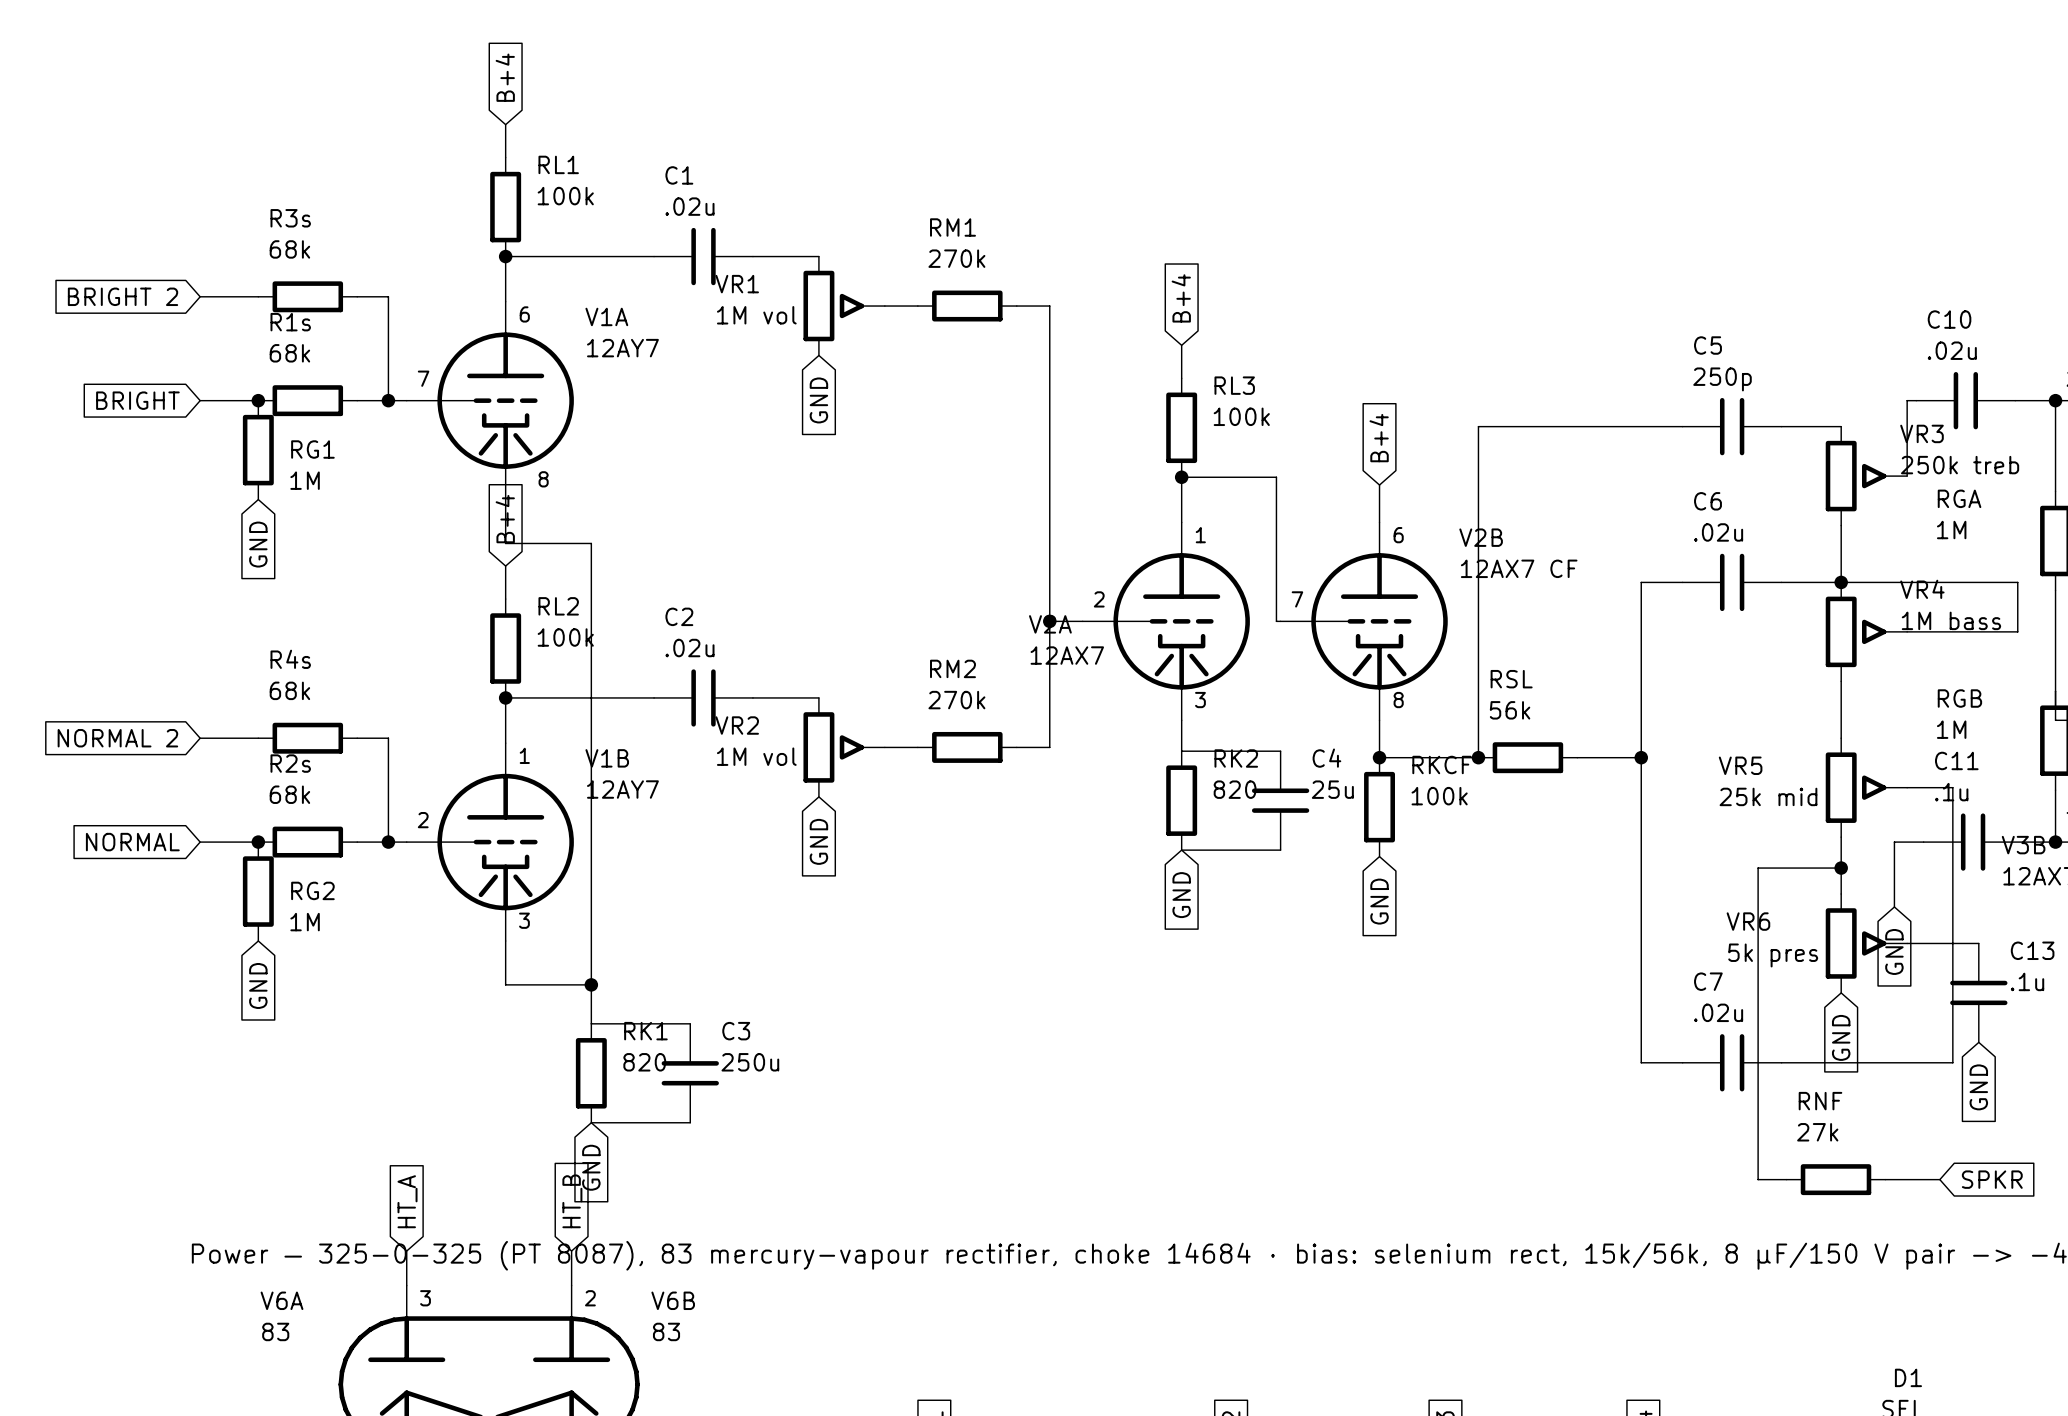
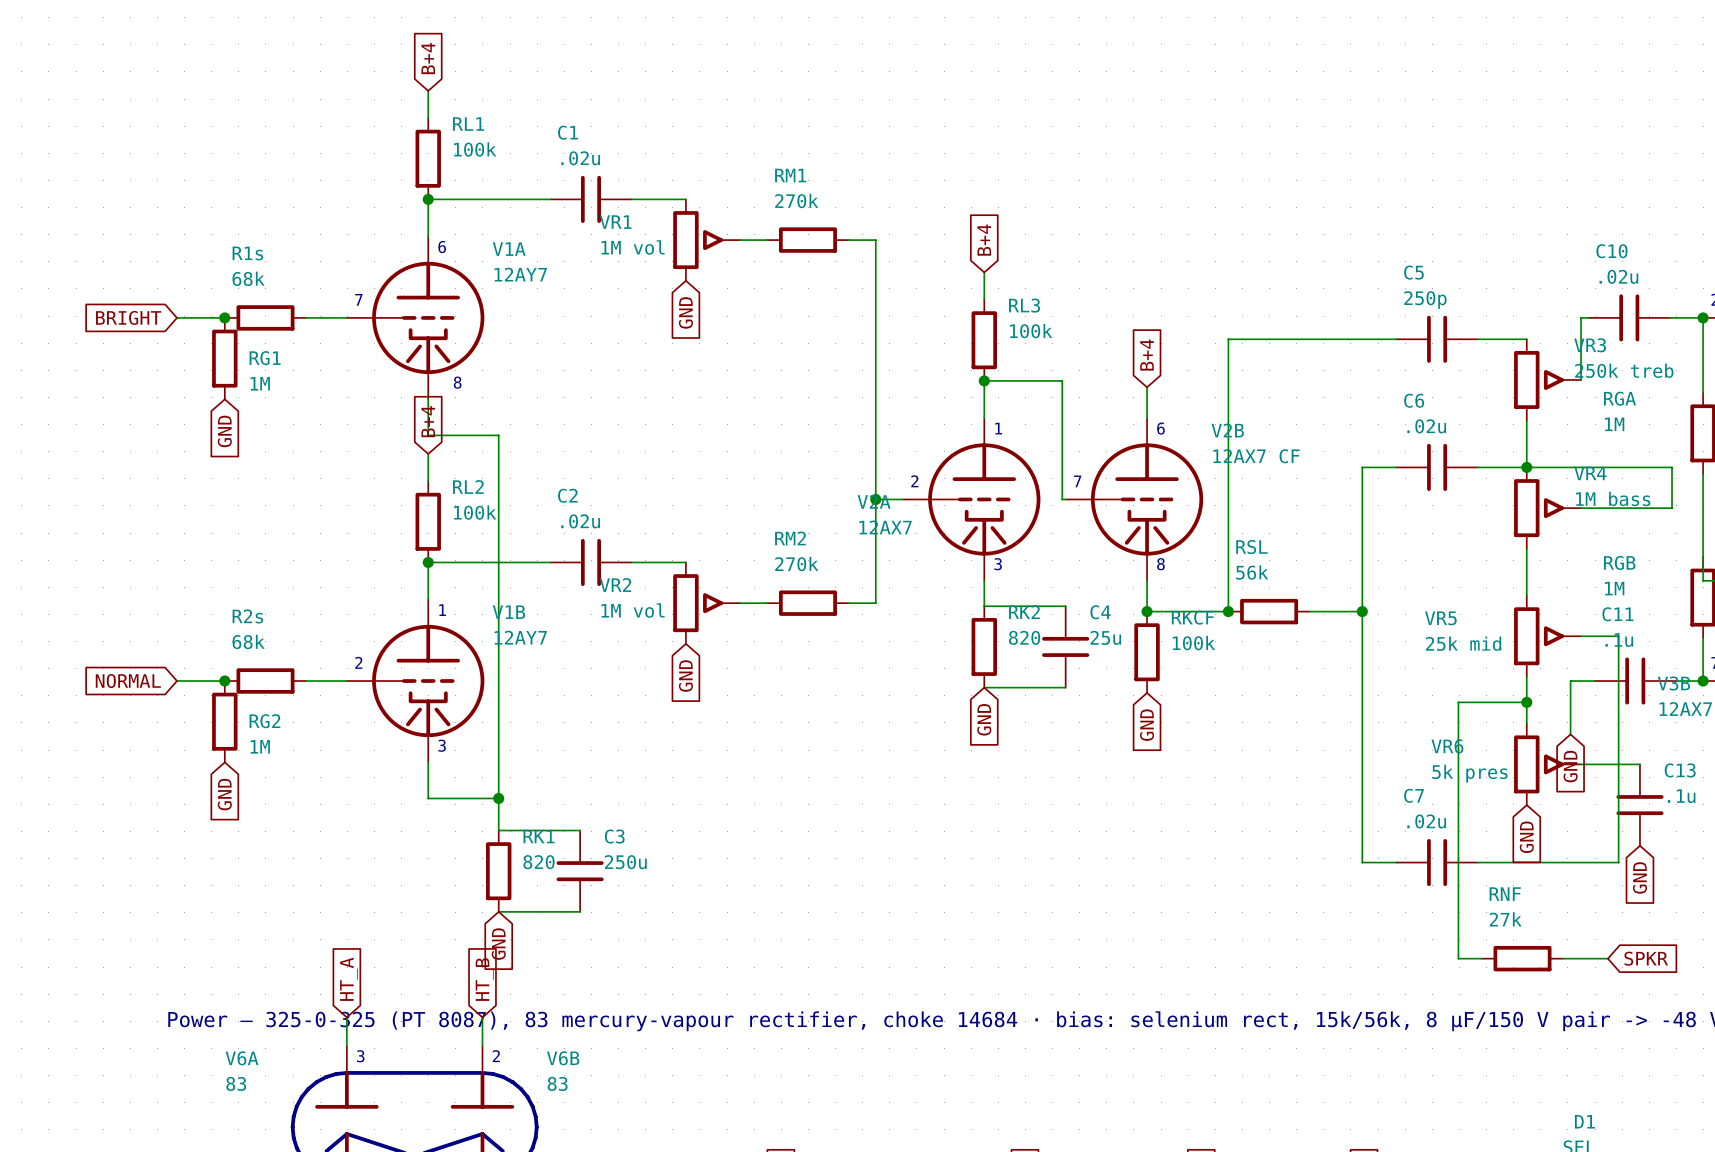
global label: BRIGHT 2 (123, 296) -> none
wire: (200, 296) (258, 296) -> none
R3s: 68k (307, 296) -> none
wire: (357, 296) (388, 296) (388, 400) -> none
junction: (388, 400) -> none
global label: NORMAL 2 (117, 738) -> none
wire: (200, 738) (258, 738) -> none
R4s: 68k (307, 738) -> none
wire: (357, 738) (388, 738) (388, 842) -> none
junction: (388, 842) -> none

